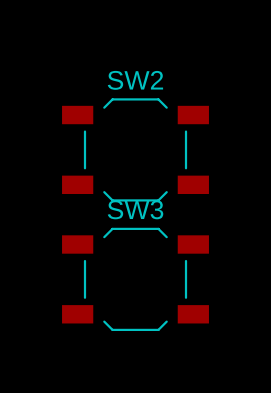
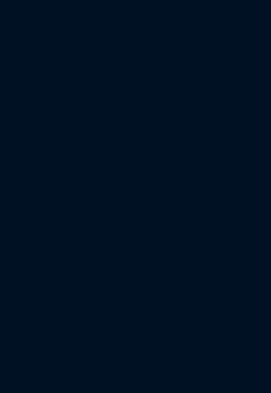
SW2: (135, 149) -> none
SW3: (135, 279) -> none

